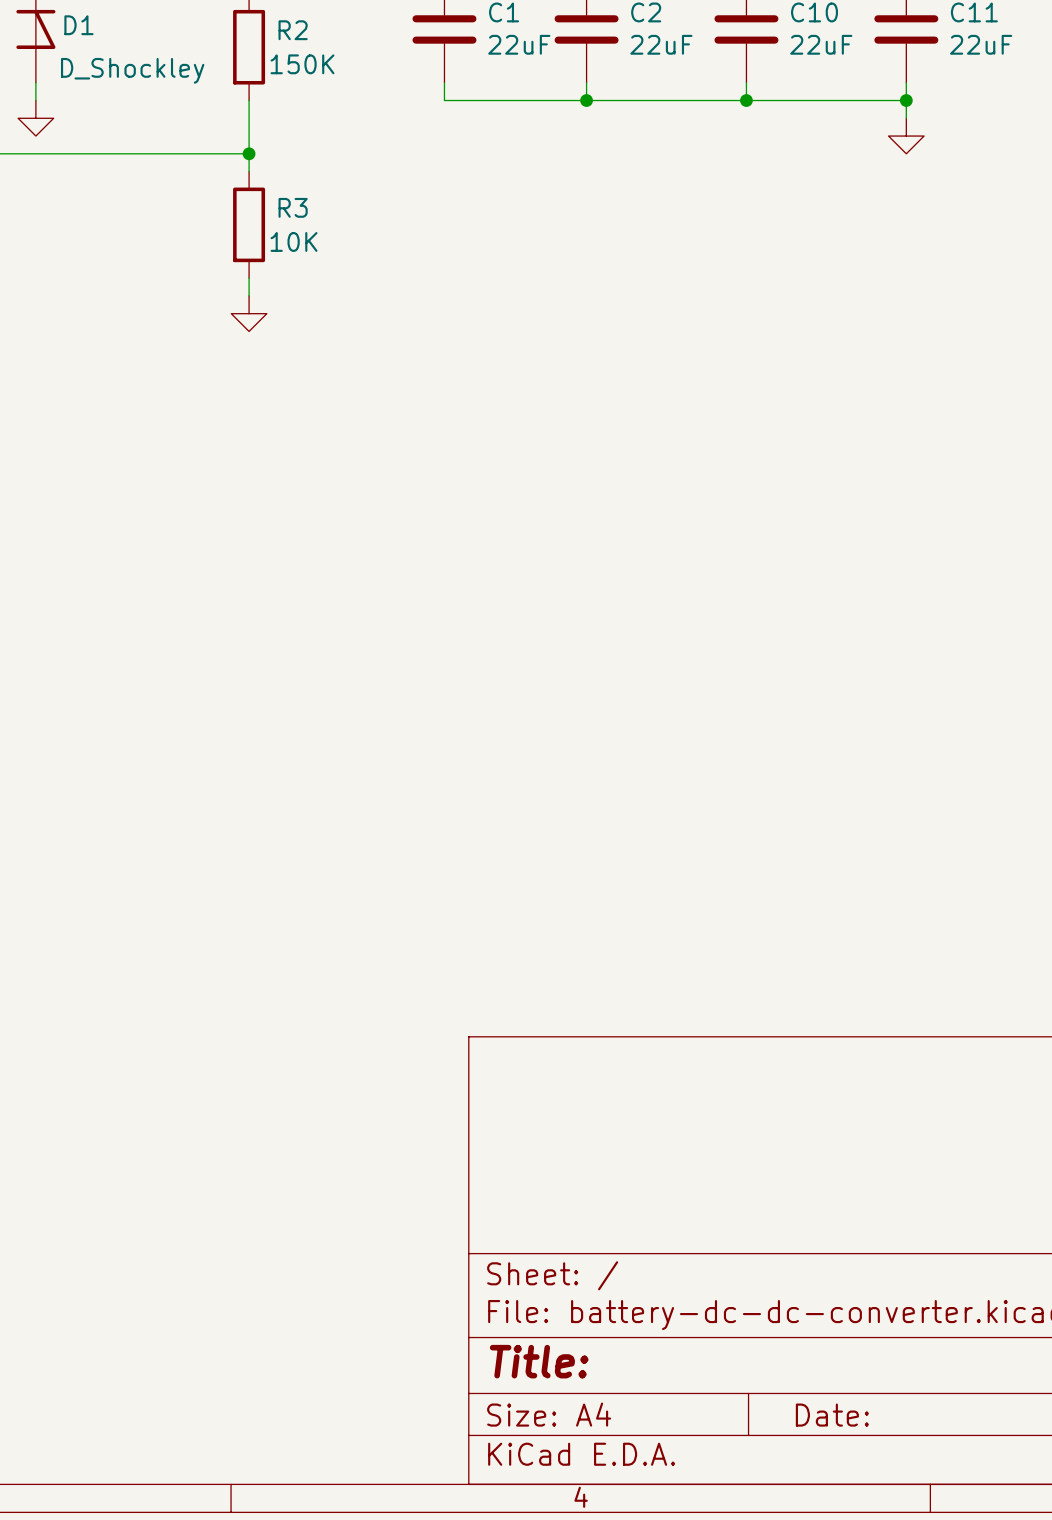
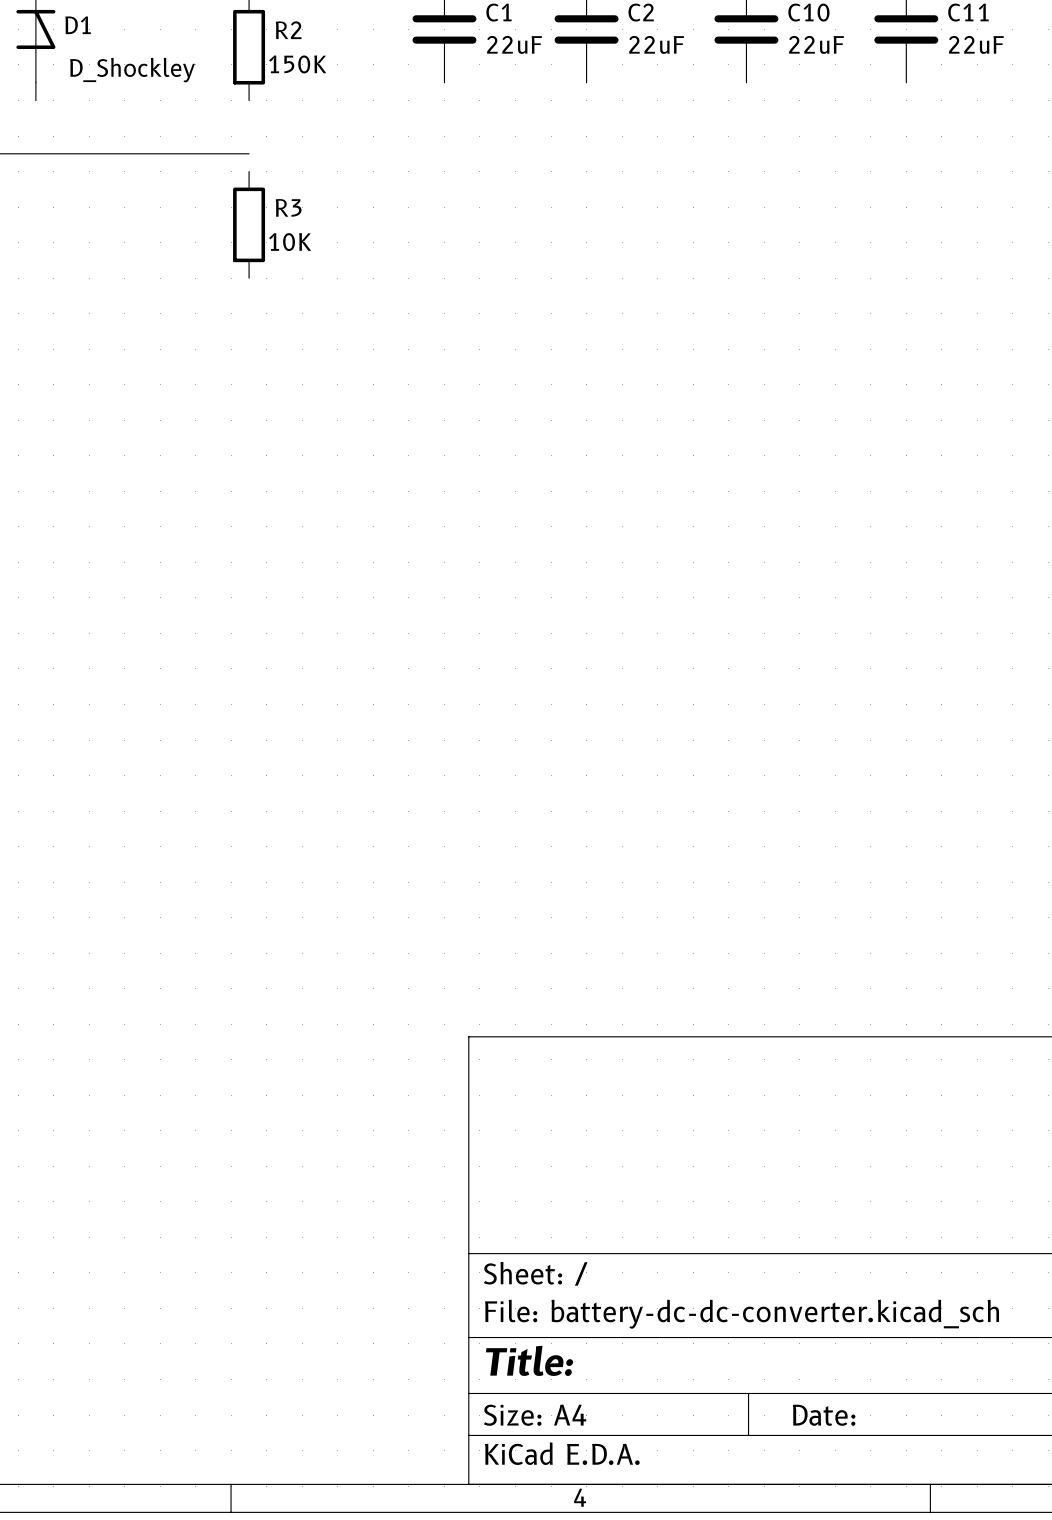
wire: (444, 82) (444, 100) (906, 100) -> none
wire: (586, 82) (586, 100) -> none
wire: (746, 82) (746, 100) -> none
wire: (906, 82) (906, 118) -> none
wire: (249, 100) (249, 171) -> none
junction: (586, 100) -> none
junction: (746, 100) -> none
junction: (906, 100) -> none
power symbol: (35, 118) -> none
power symbol: (906, 136) -> none
junction: (249, 153) -> none
wire: (249, 278) (249, 295) -> none
power symbol: (249, 313) -> none

